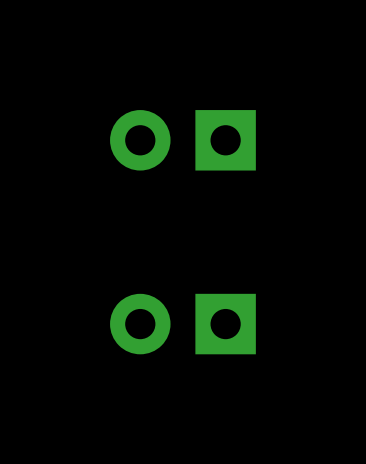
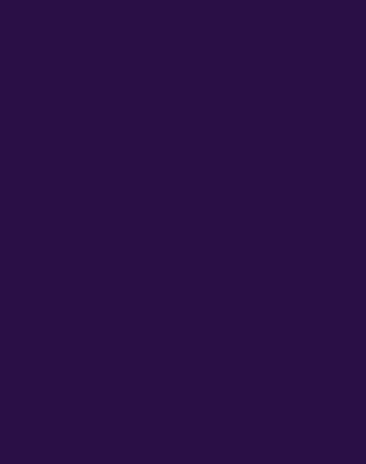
part: (182, 140) -> none
part: (182, 324) -> none

